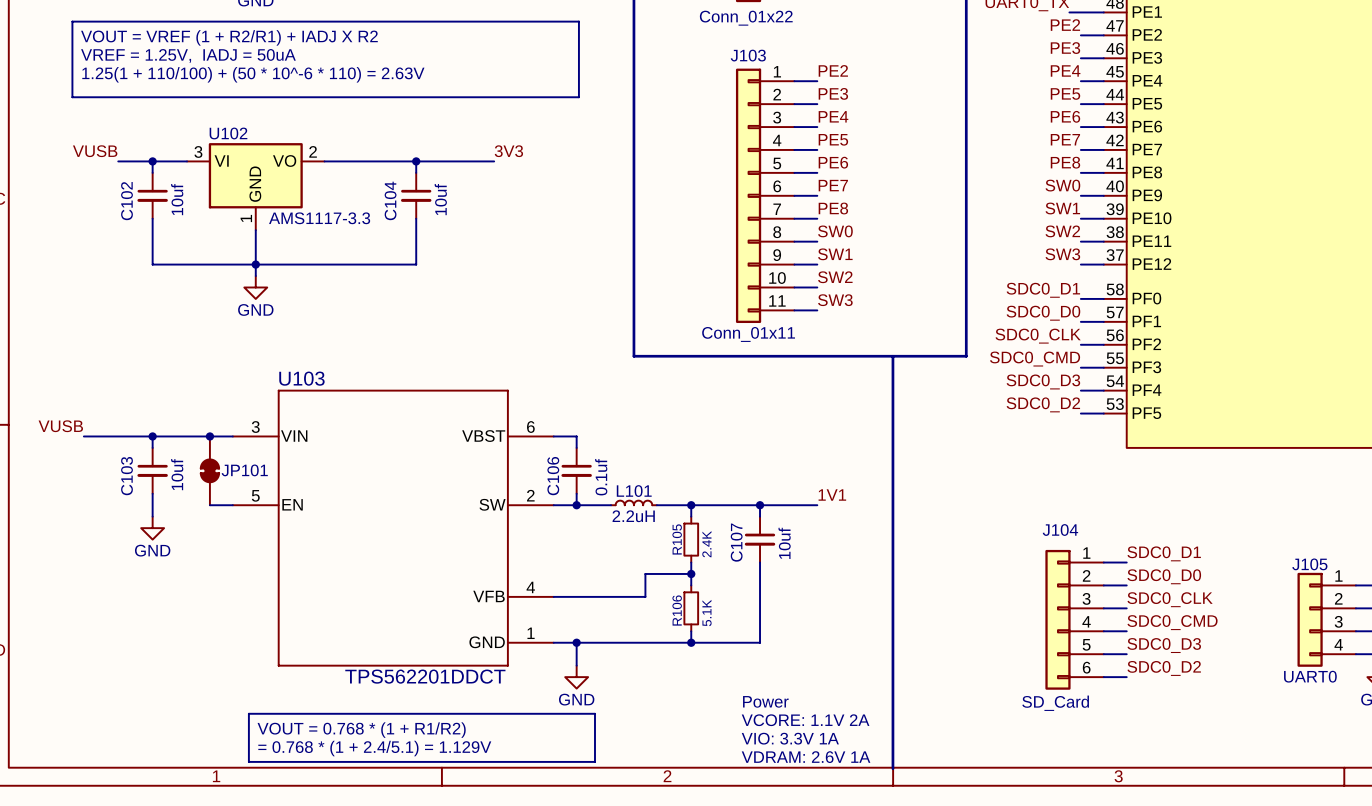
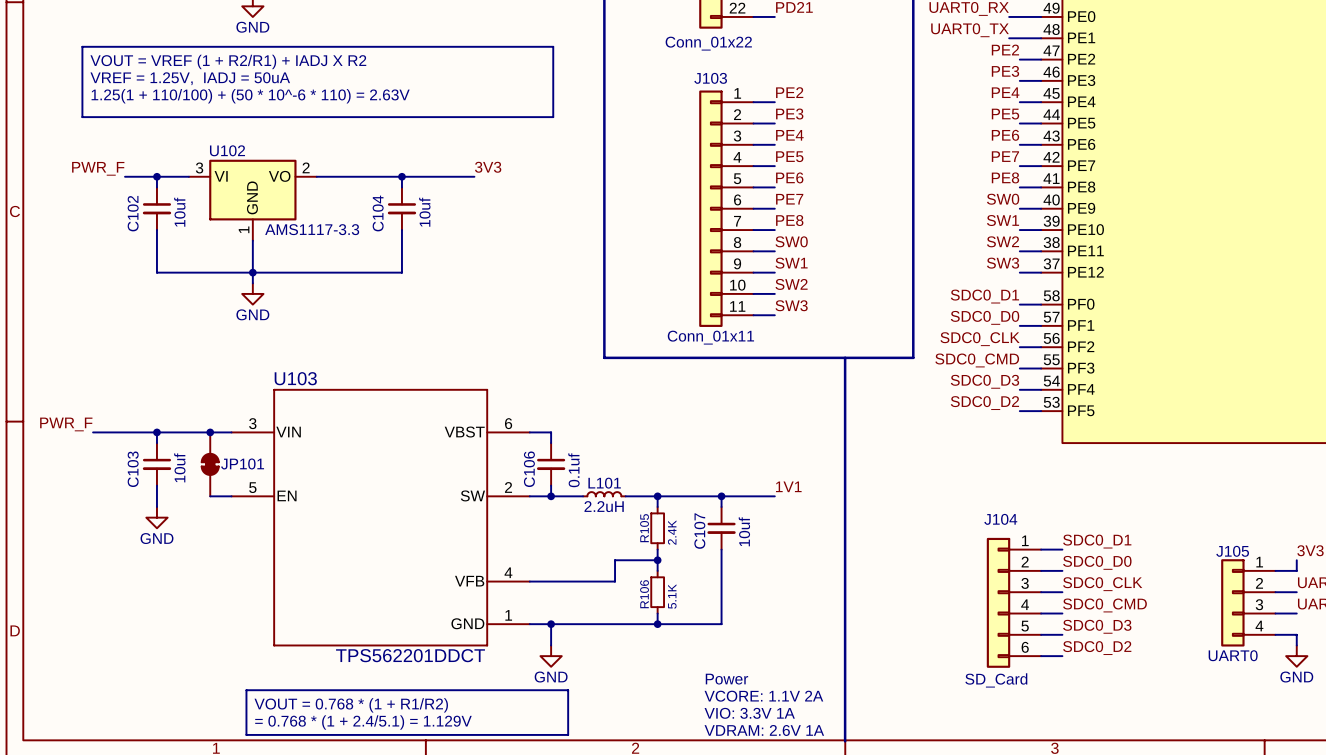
label: VUSB (95, 151) -> PWR_F (98, 168)
label: VUSB (60, 426) -> PWR_F (66, 424)

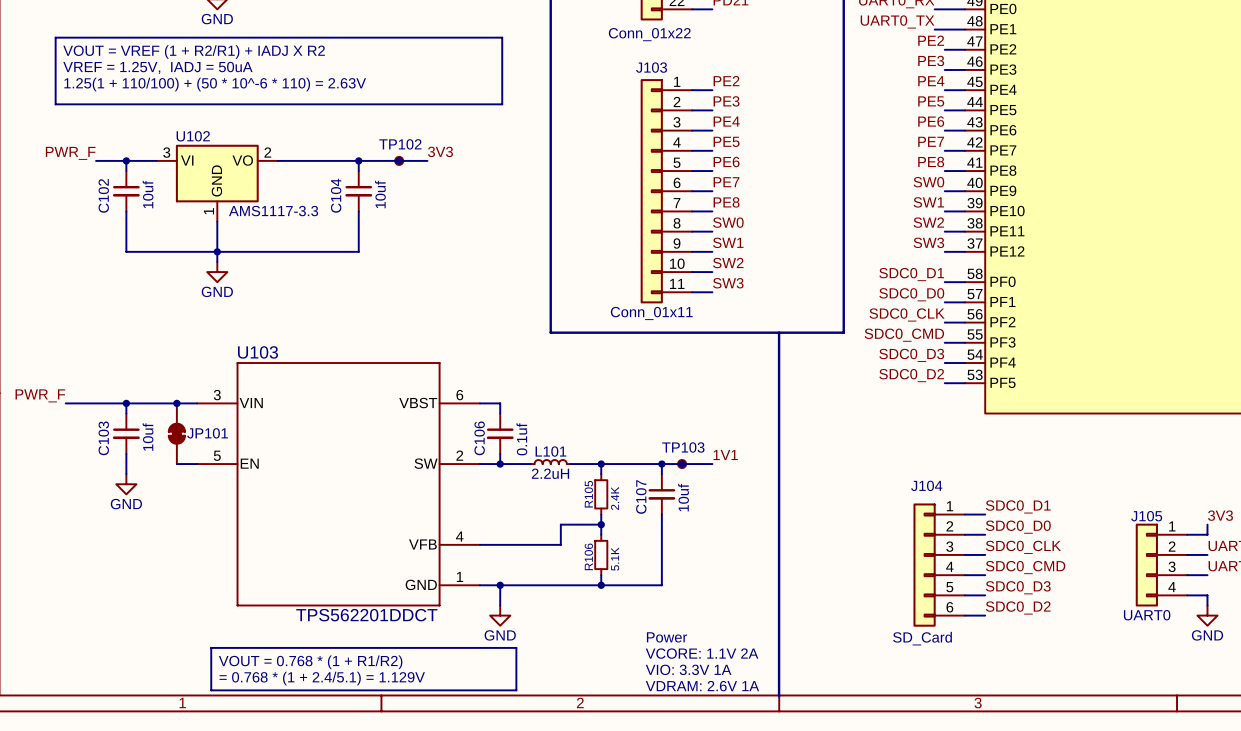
junction: none -> (399, 160)
TP102: none -> (399, 160)
junction: none -> (682, 464)
TP103: none -> (682, 464)

